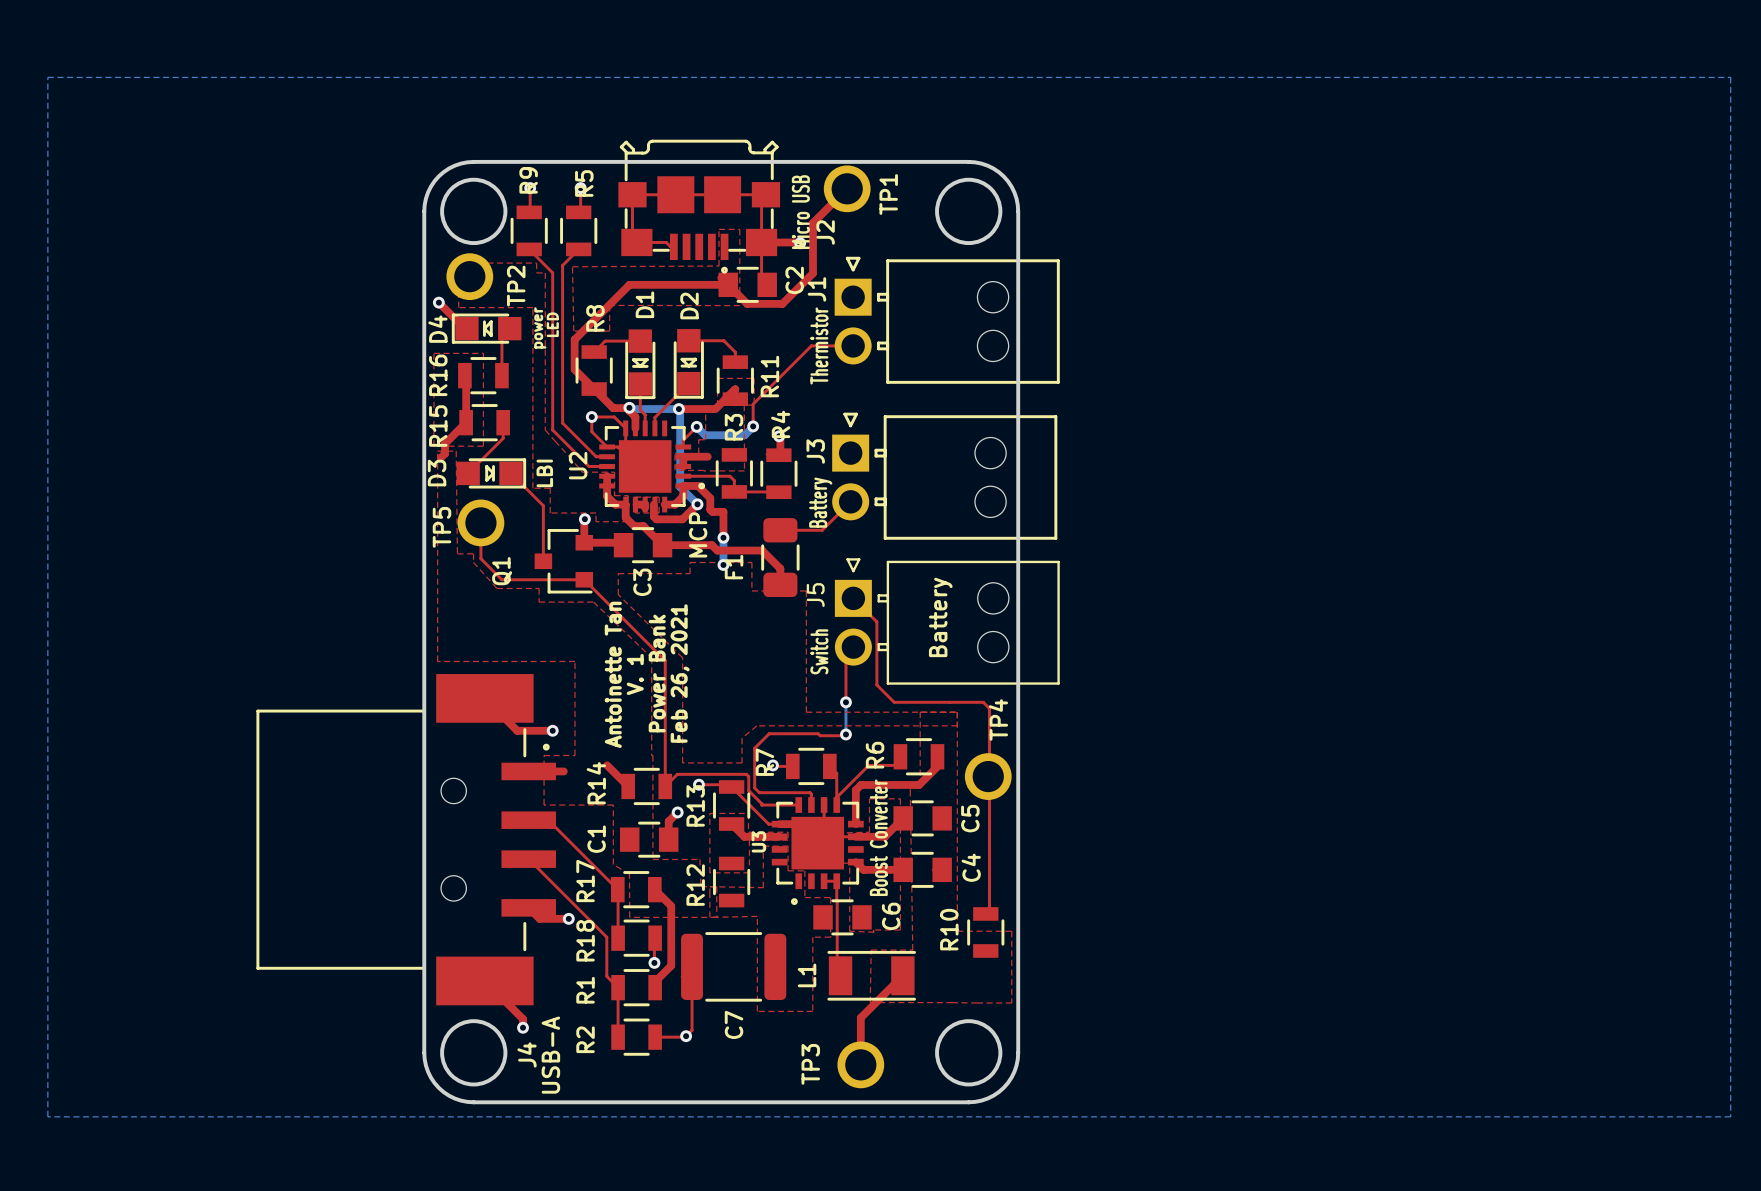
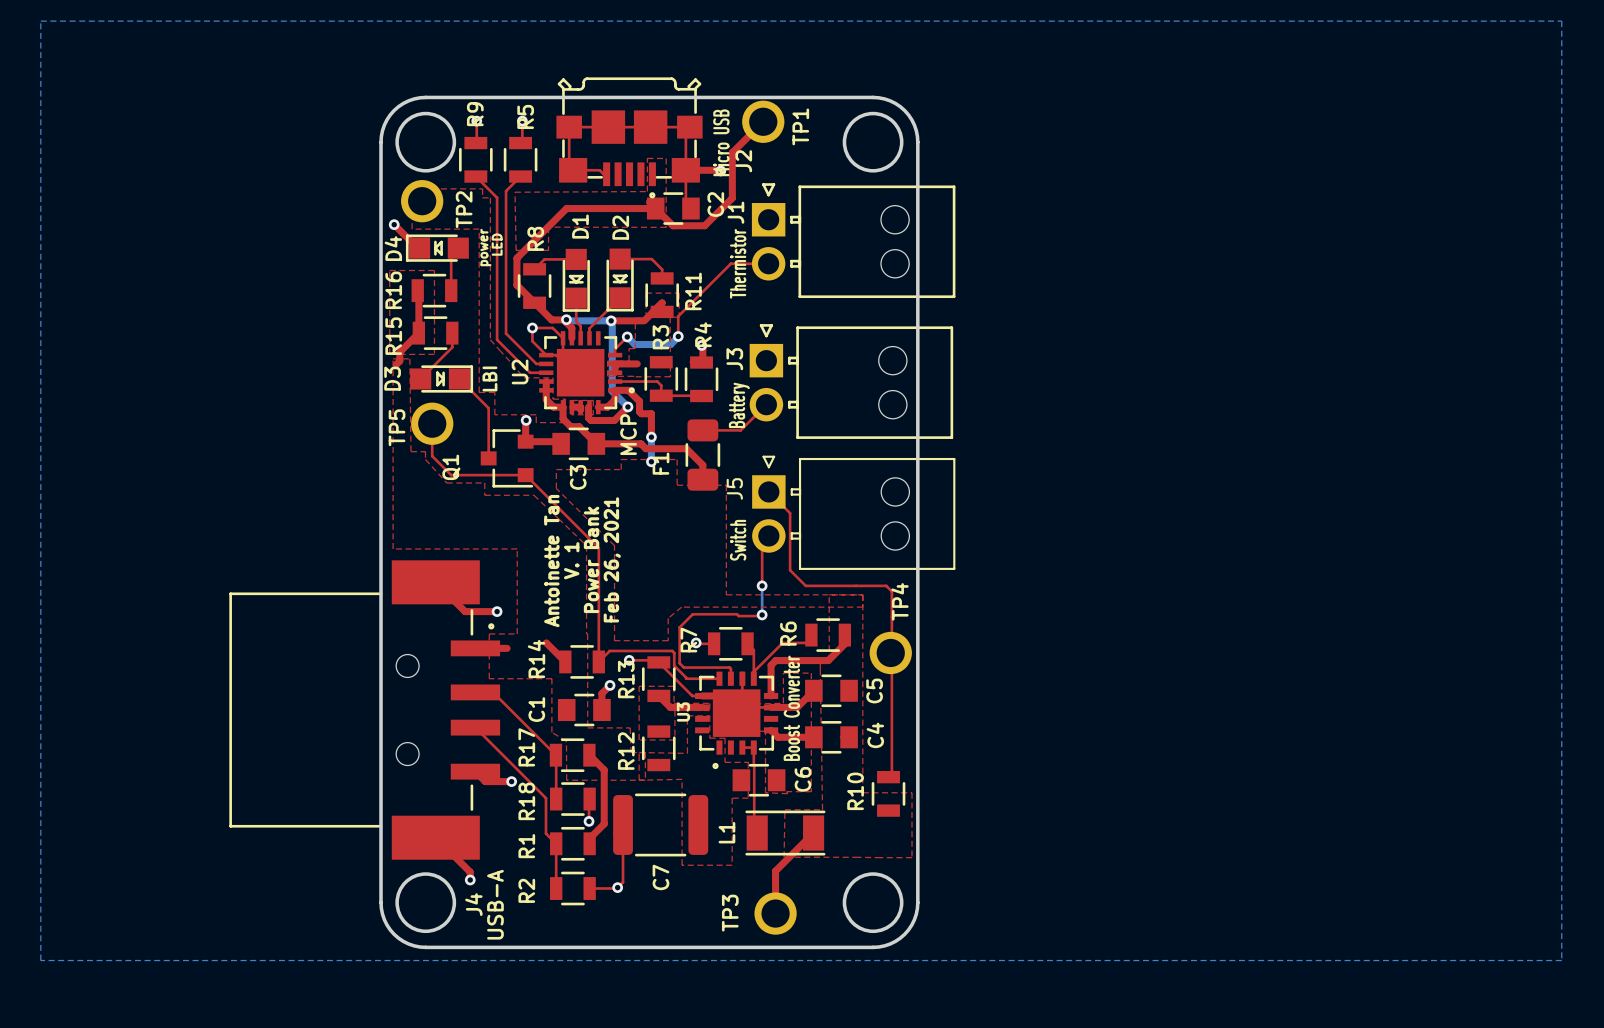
text: Battery (940, 617) -> none

